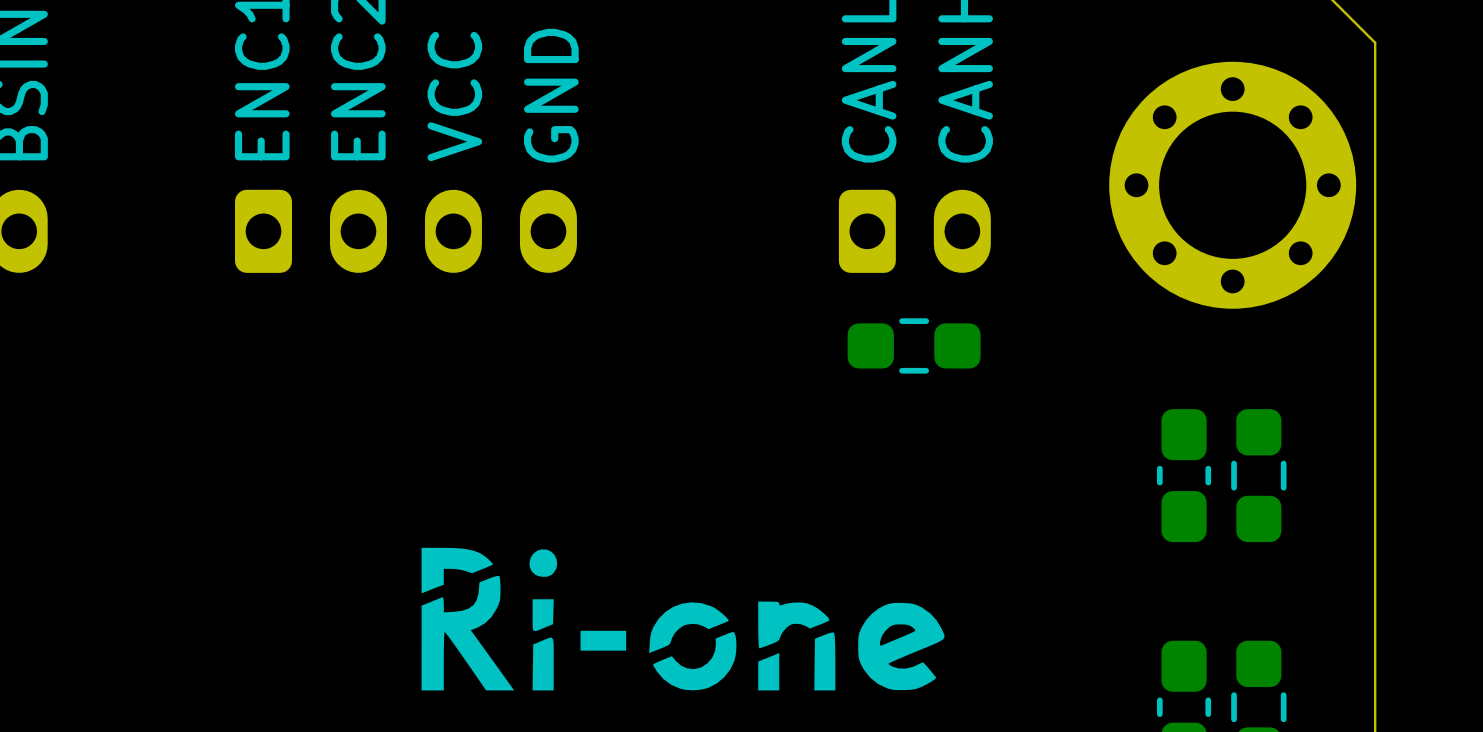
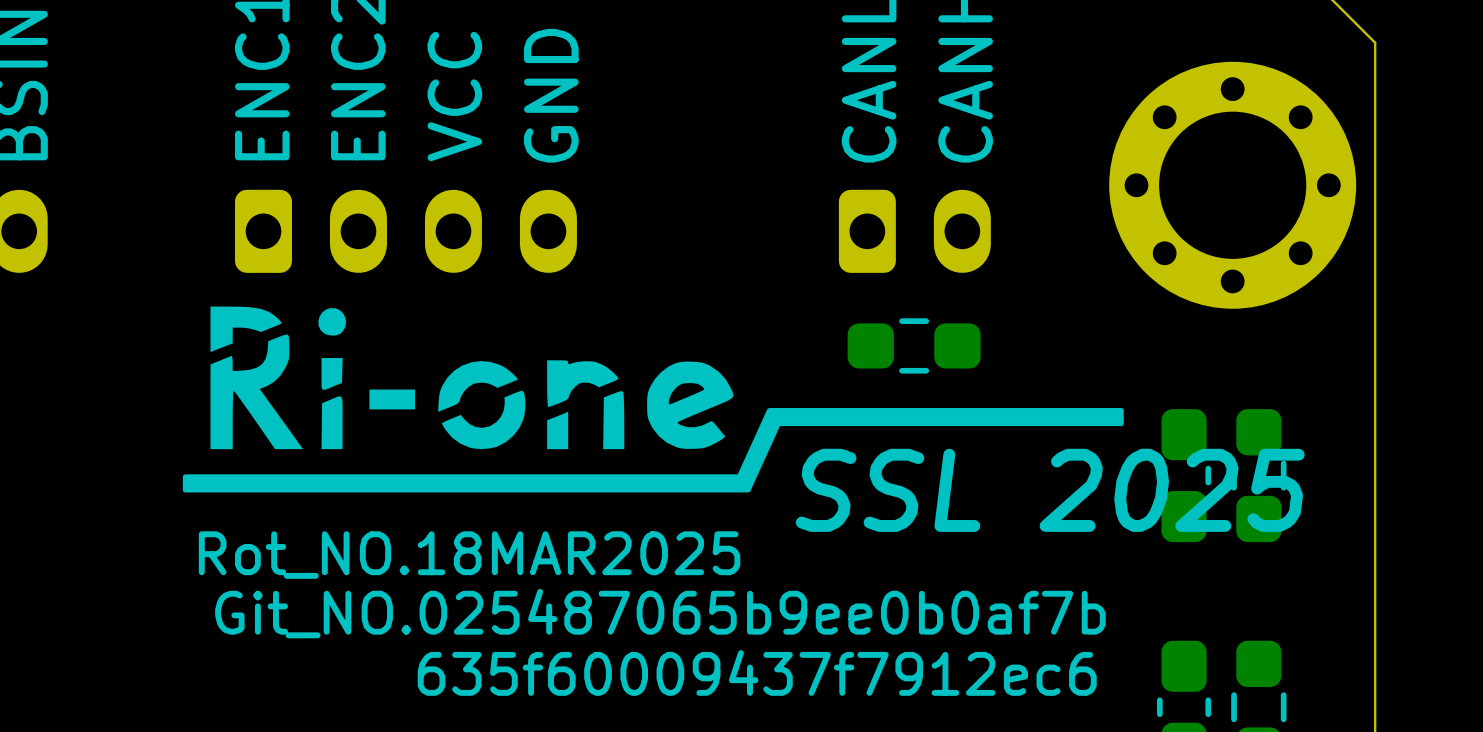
drawing: none -> [182, 408, 1124, 493]
text: none -> SSL 2025 (1050, 490)
text: none -> Rot_NO.18MAR2025 (469, 555)
text: none -> Git_NO.025487065b9ee0b0af7b (660, 613)
drawing position: (683, 619) -> (471, 377)
text: none -> 635f60009437f7912ec6 (757, 672)

